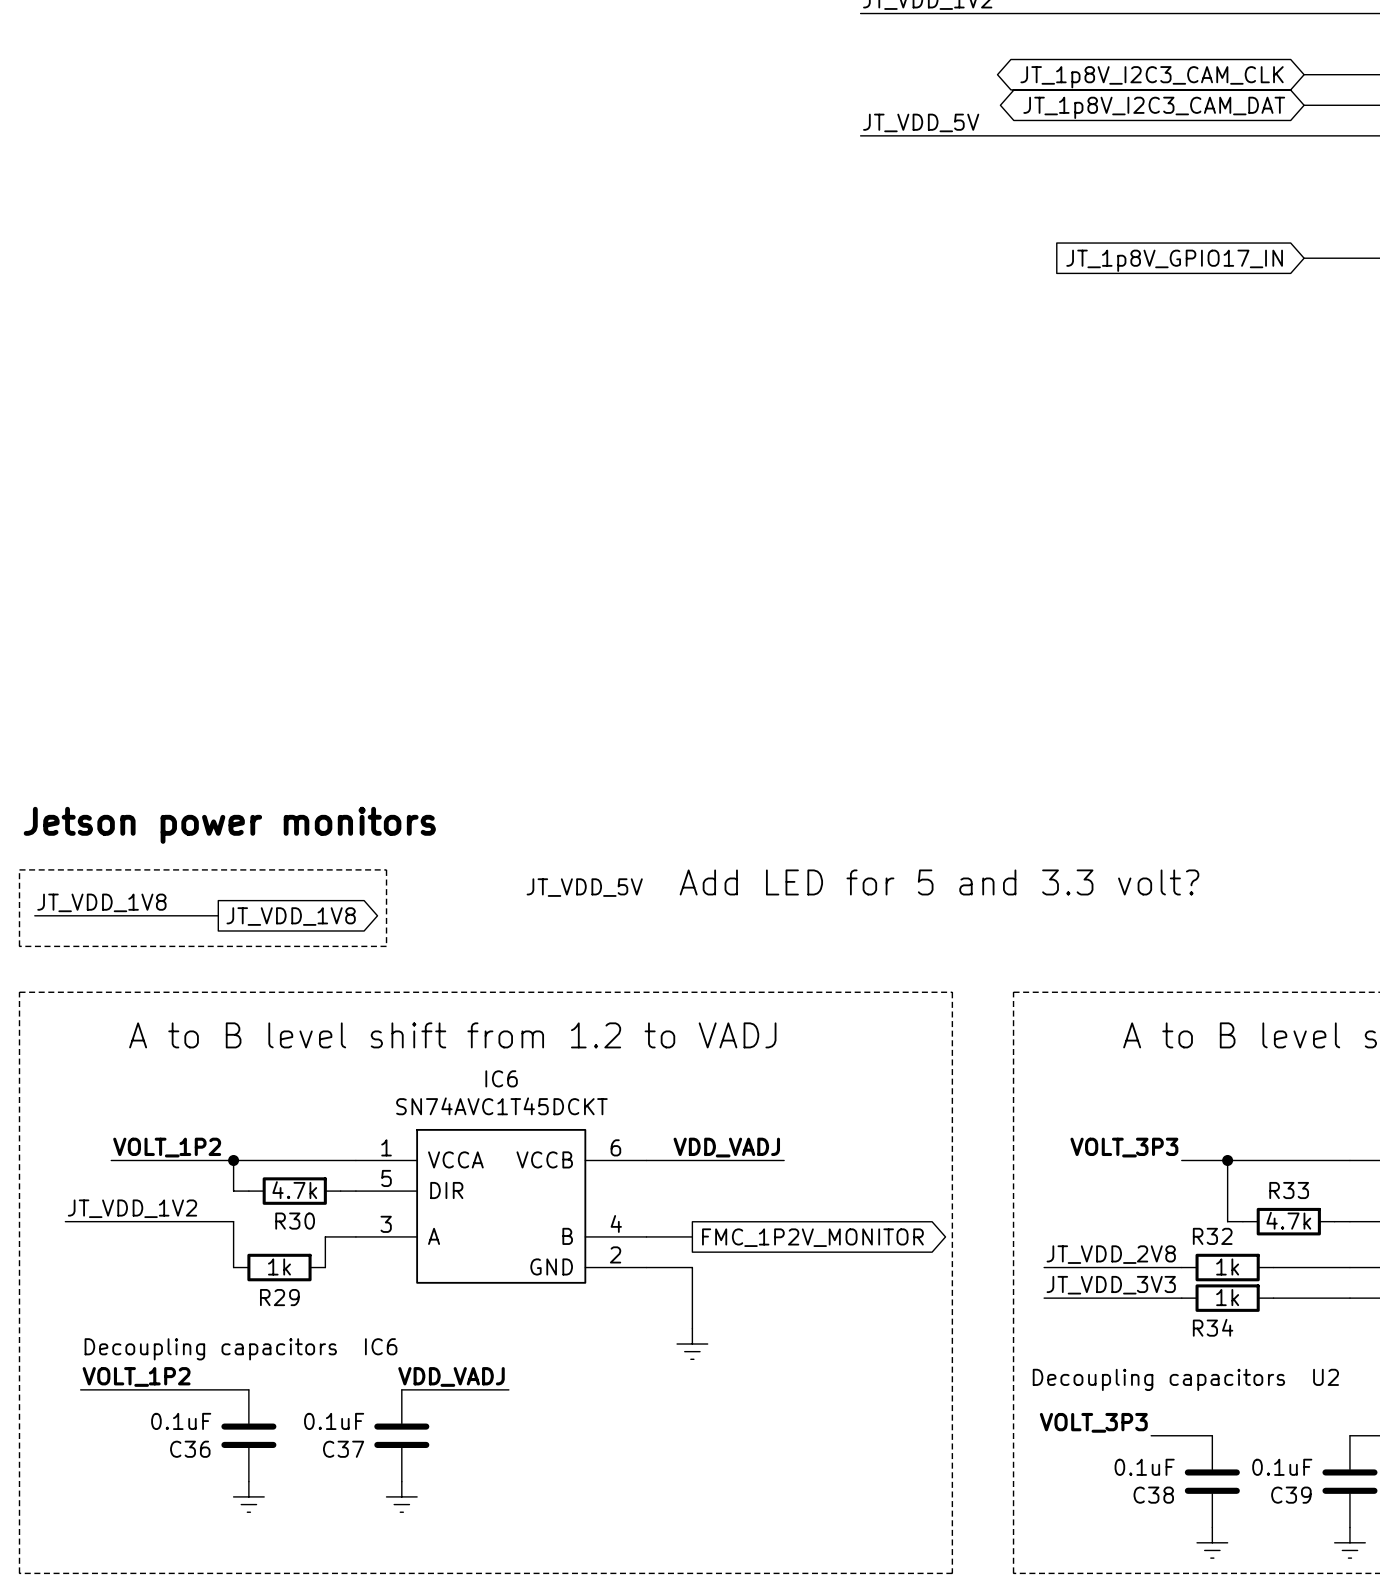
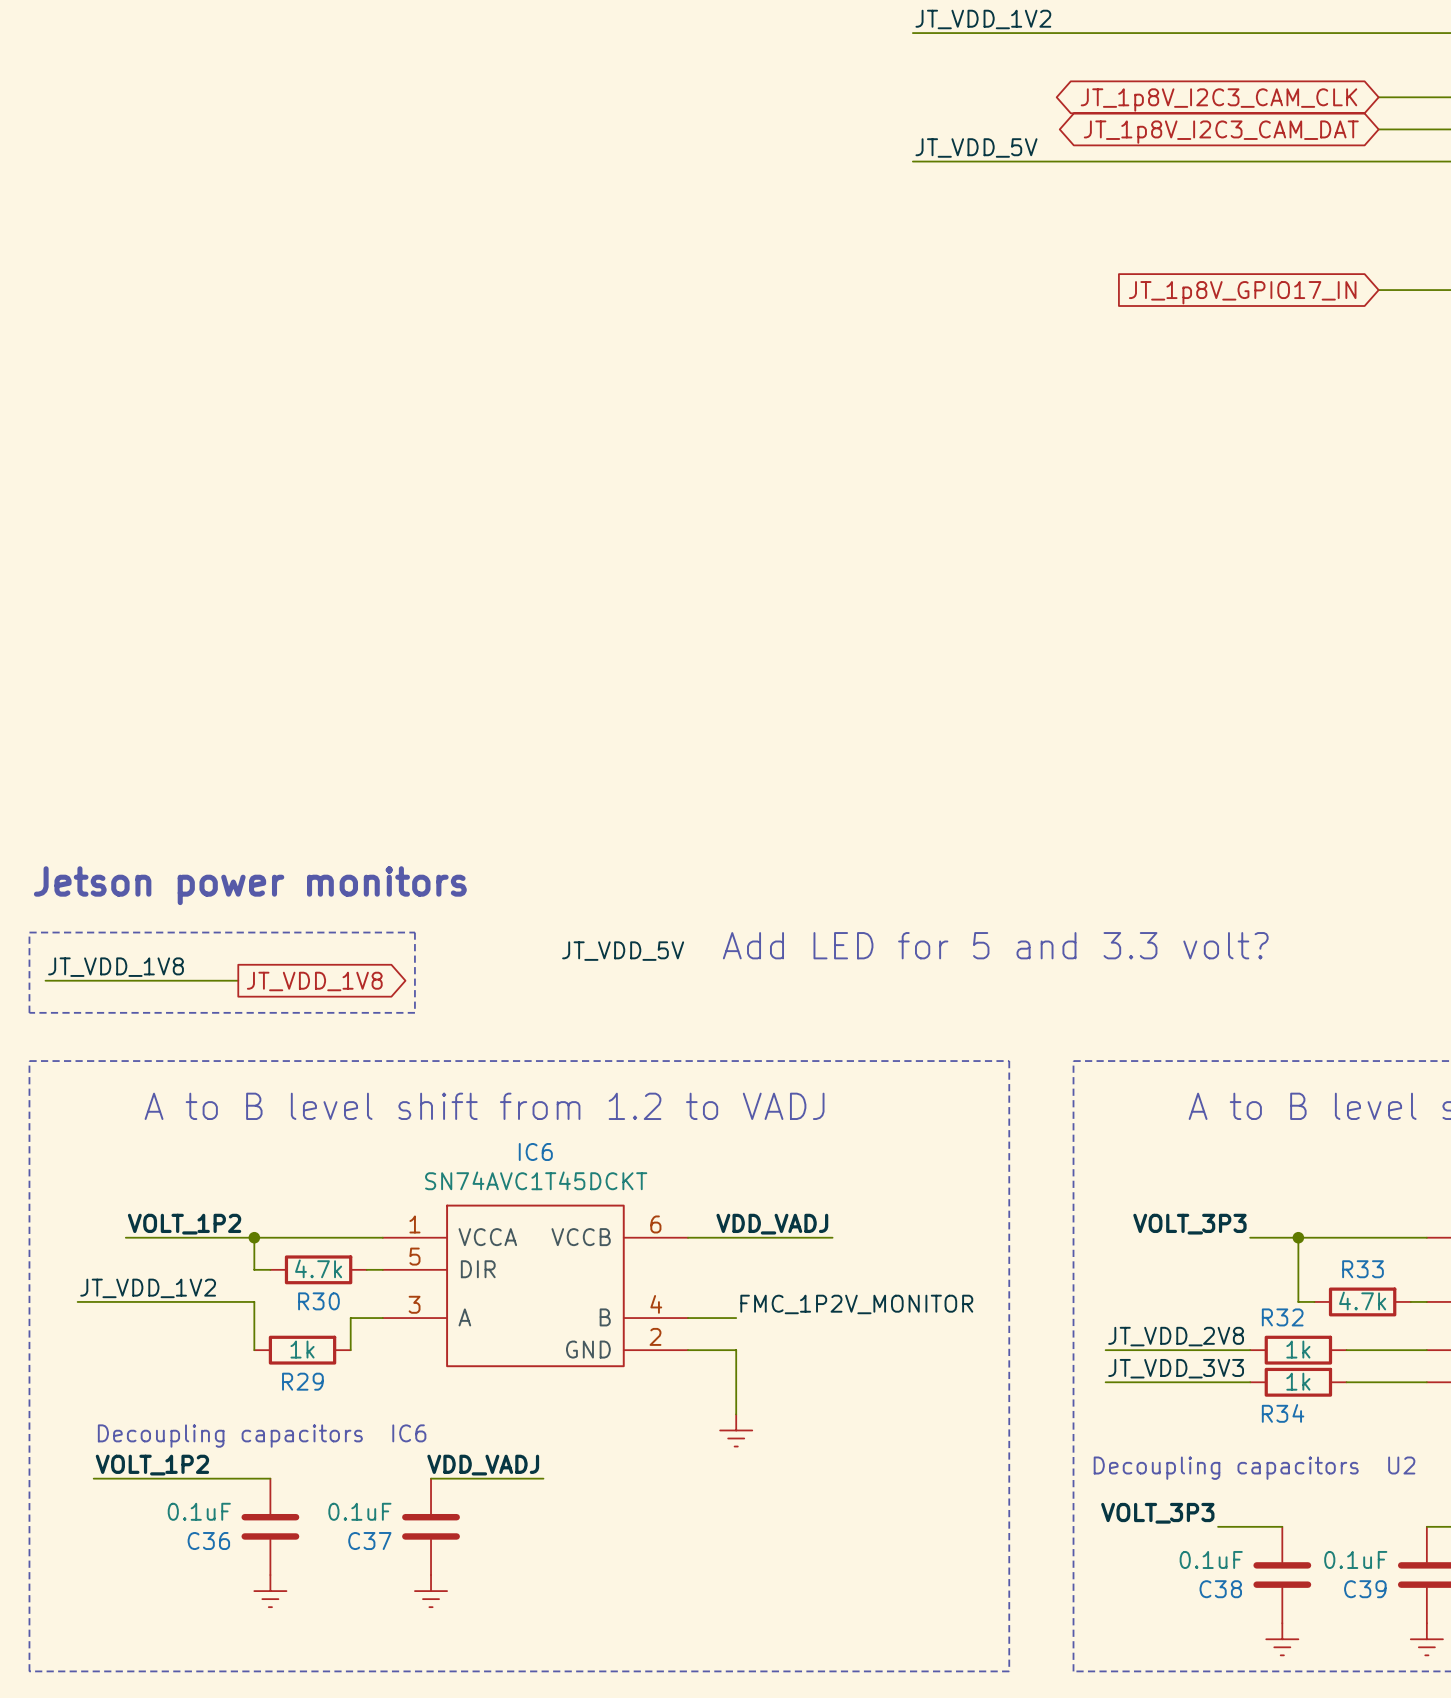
label: none -> FMC_1P2V_MONITOR (856, 1304)
global label: FMC_1P2V_MONITOR (812, 1237) -> none

